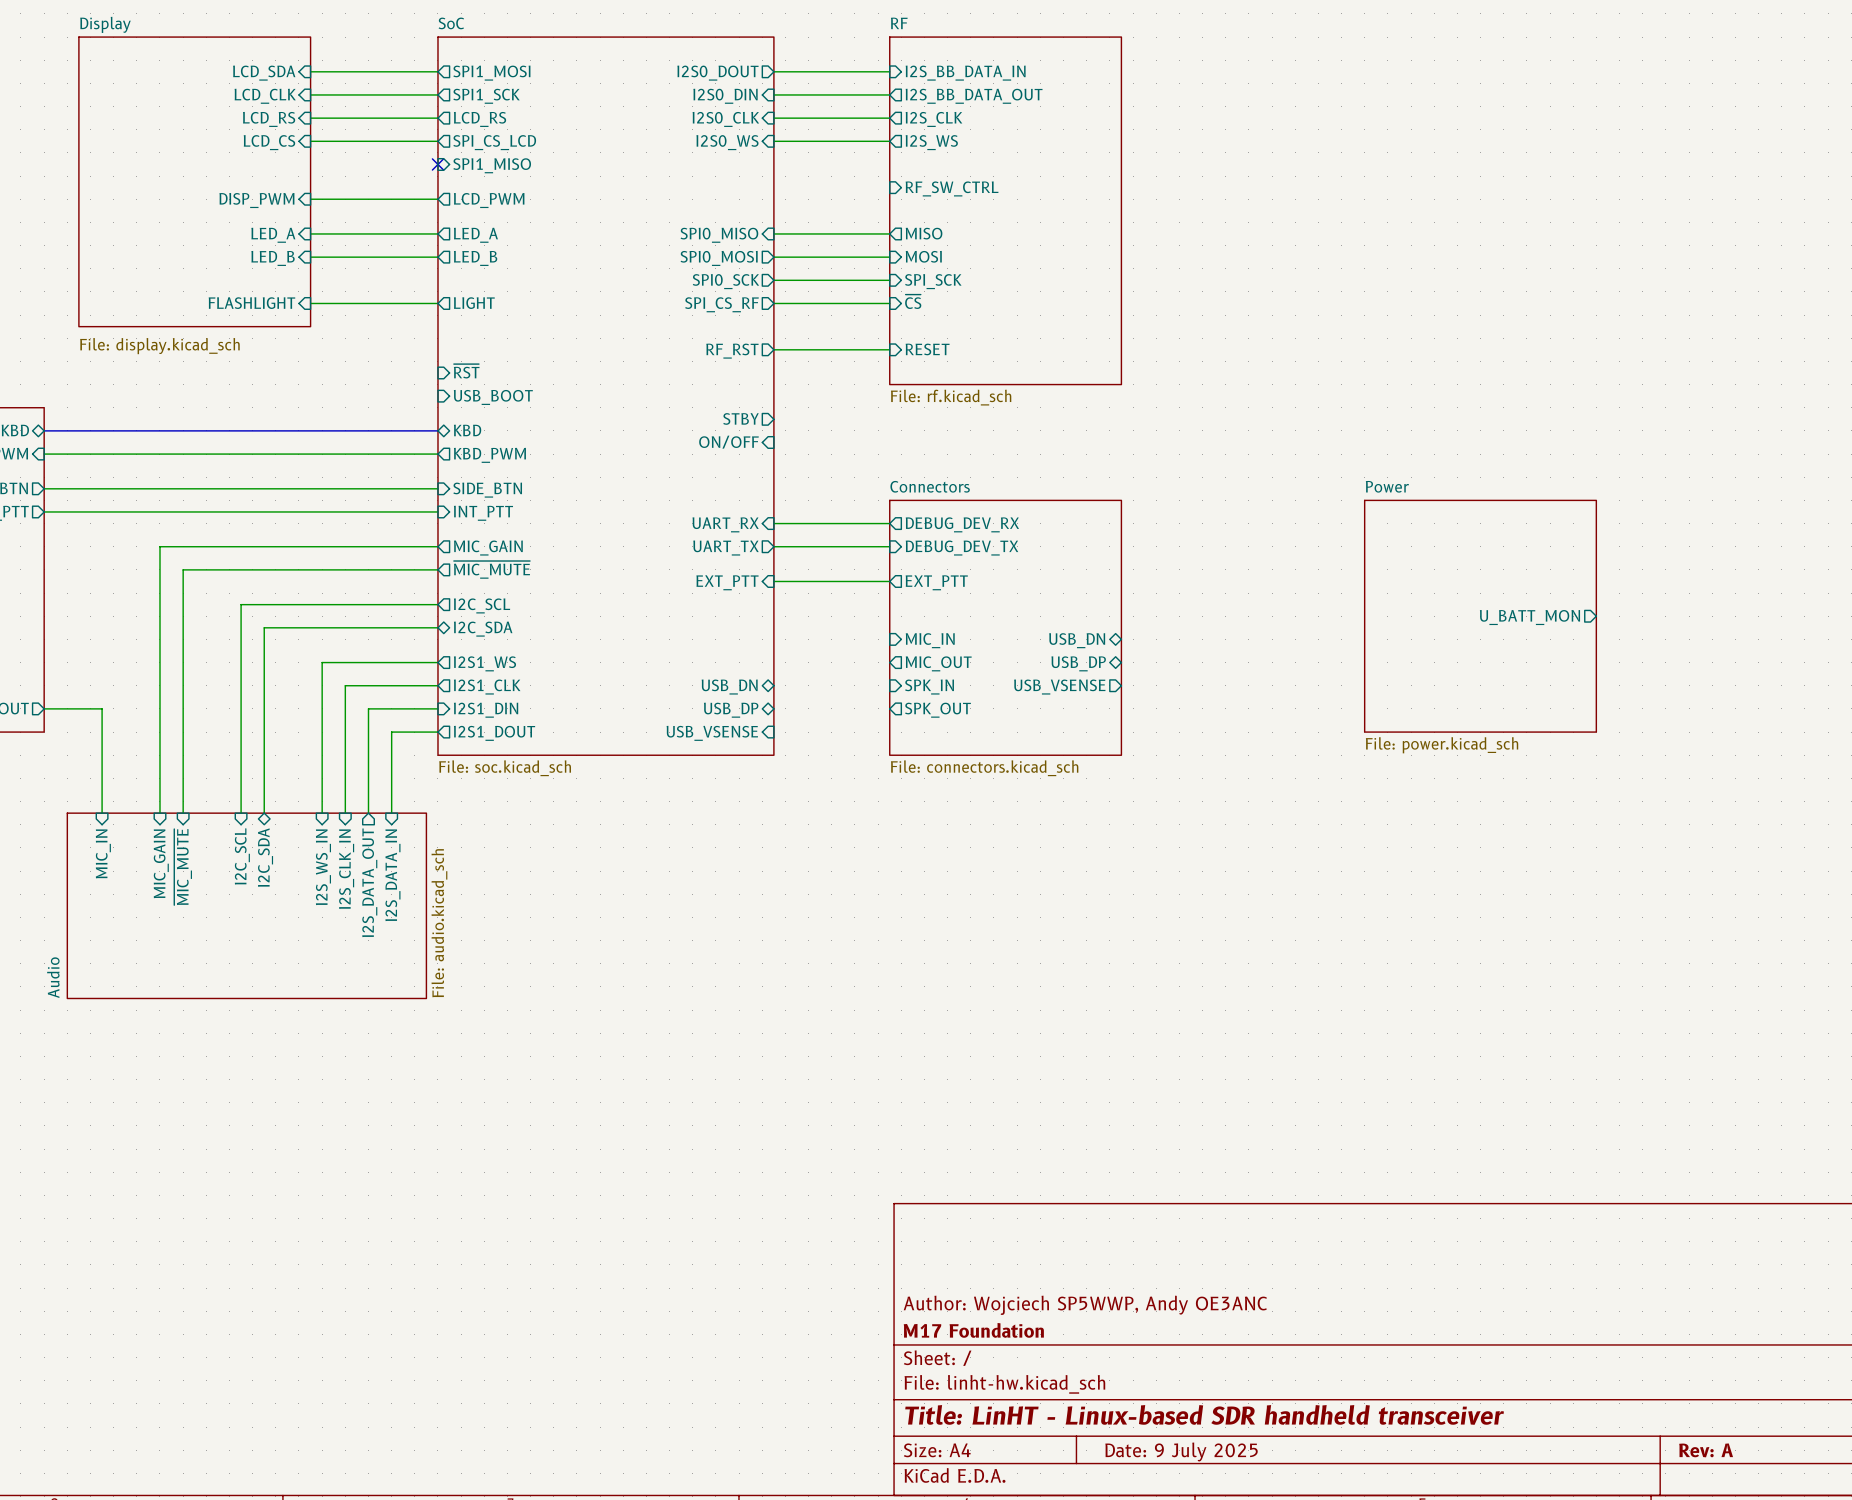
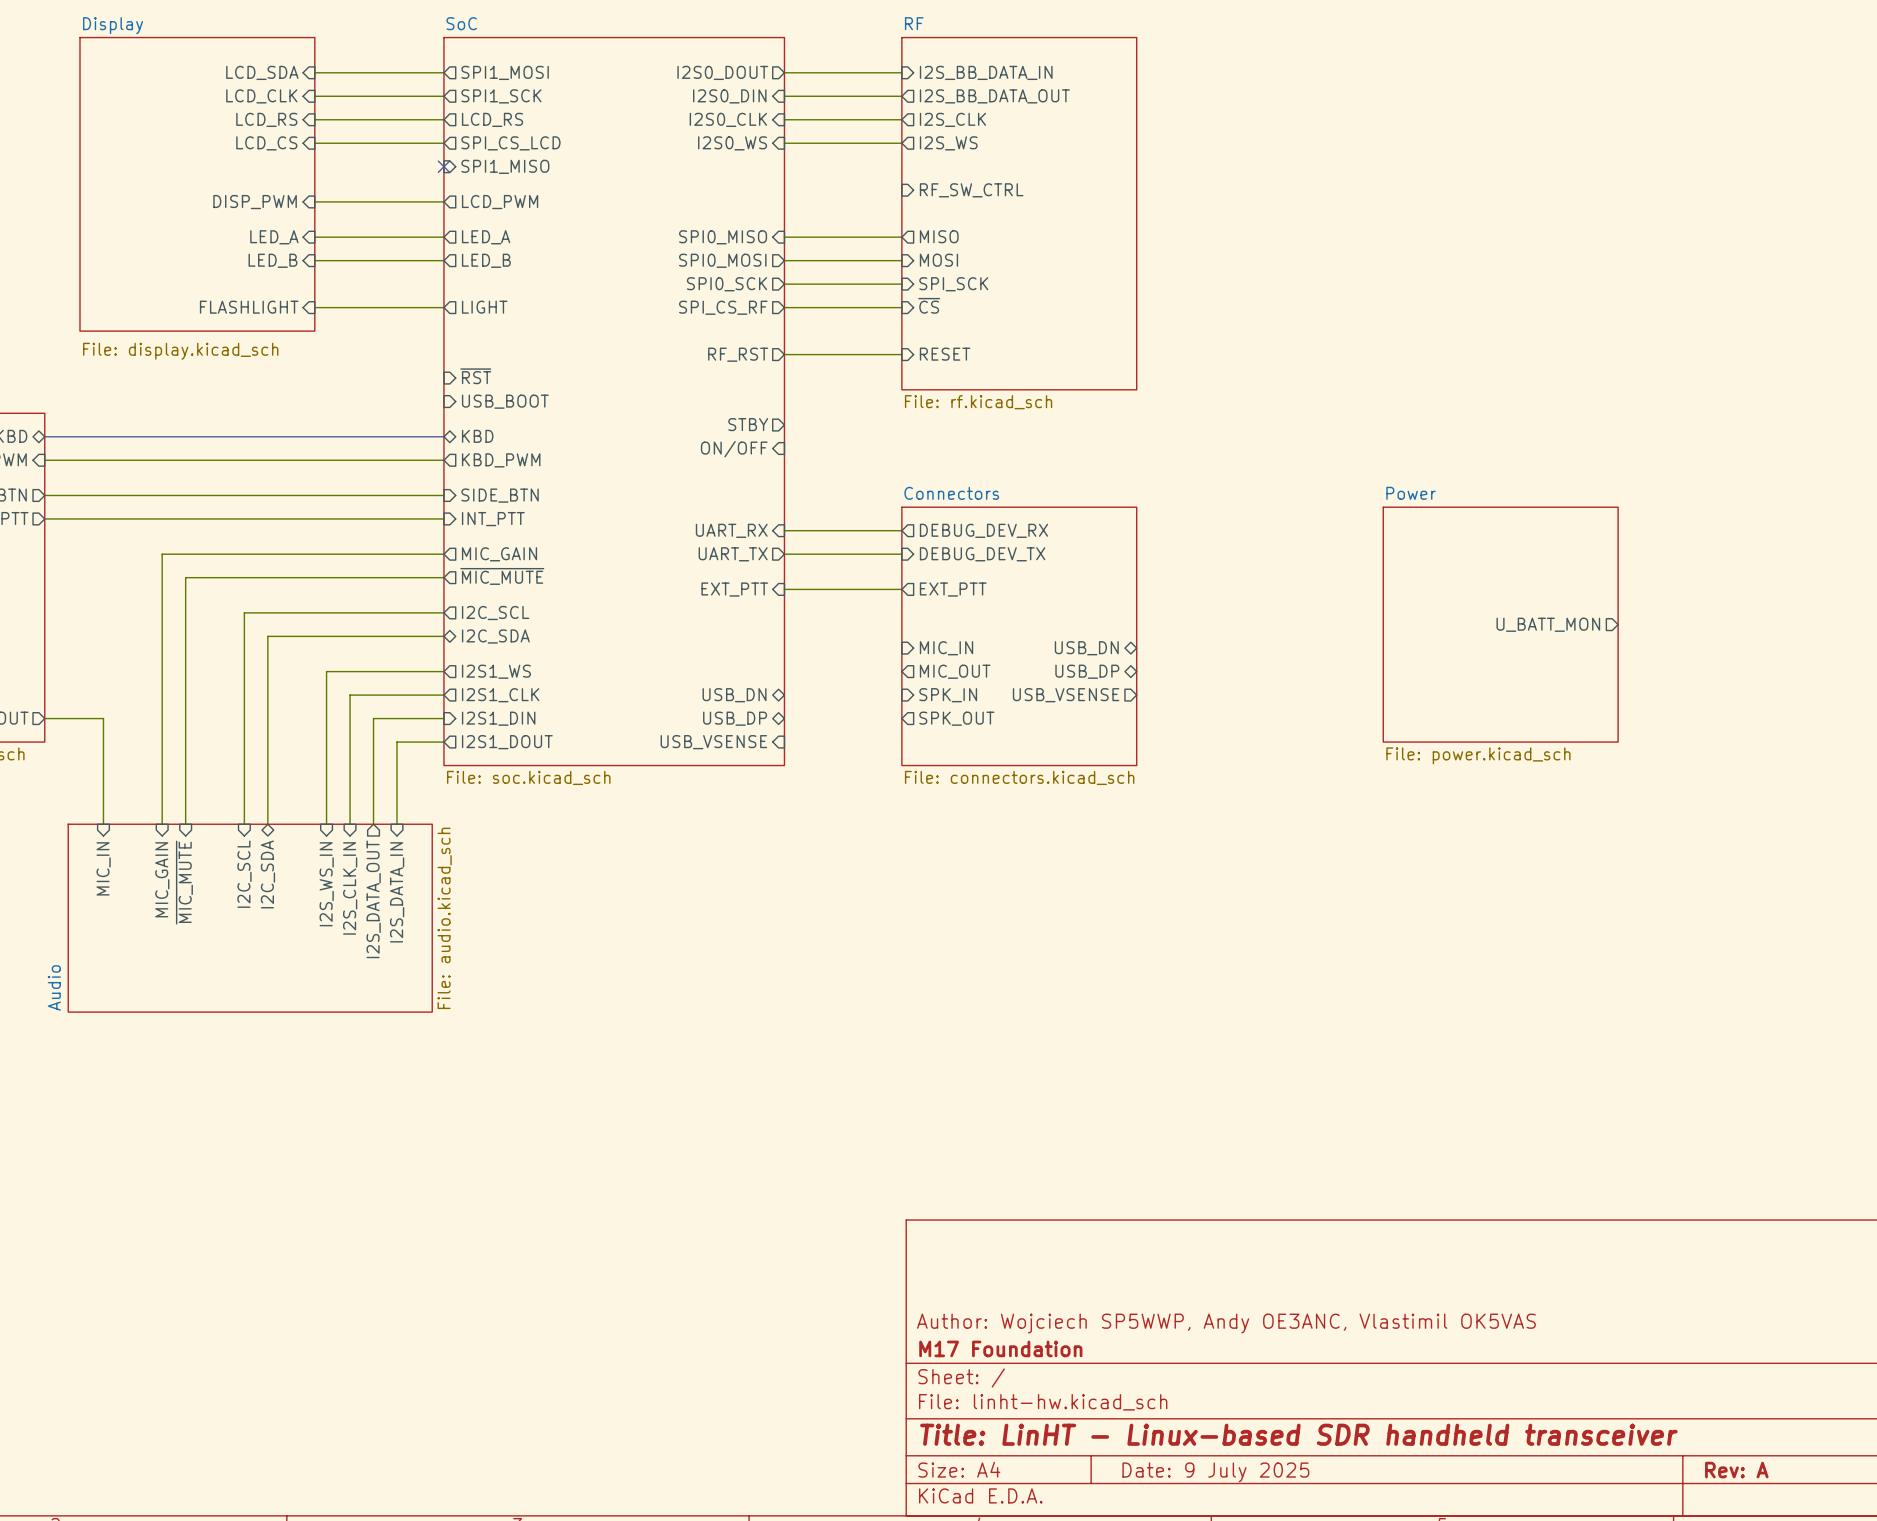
title block: Author: Wojciech SP5WWP, Andy OE3ANC (1085, 1305) -> Author: Wojciech SP5WWP, Andy OE3ANC, Vlastimil OK5VAS (1226, 1323)

